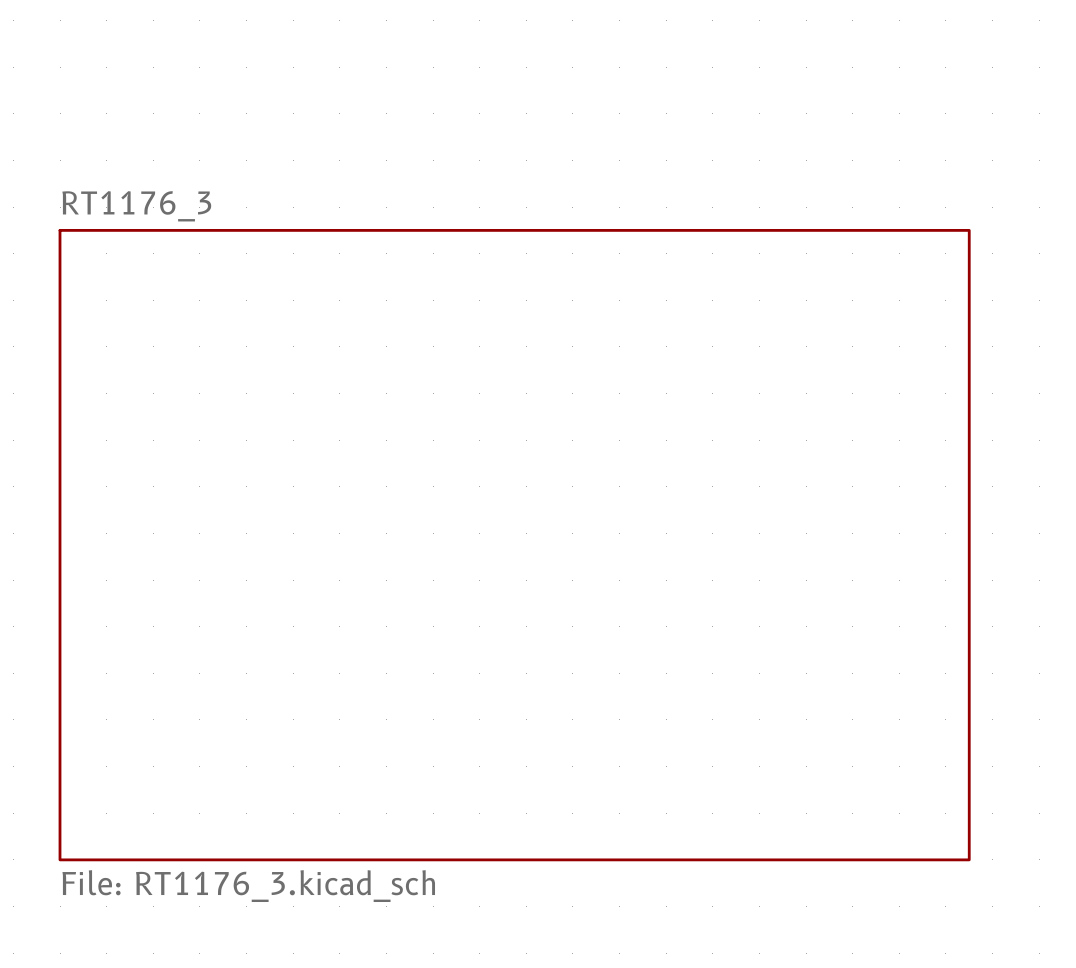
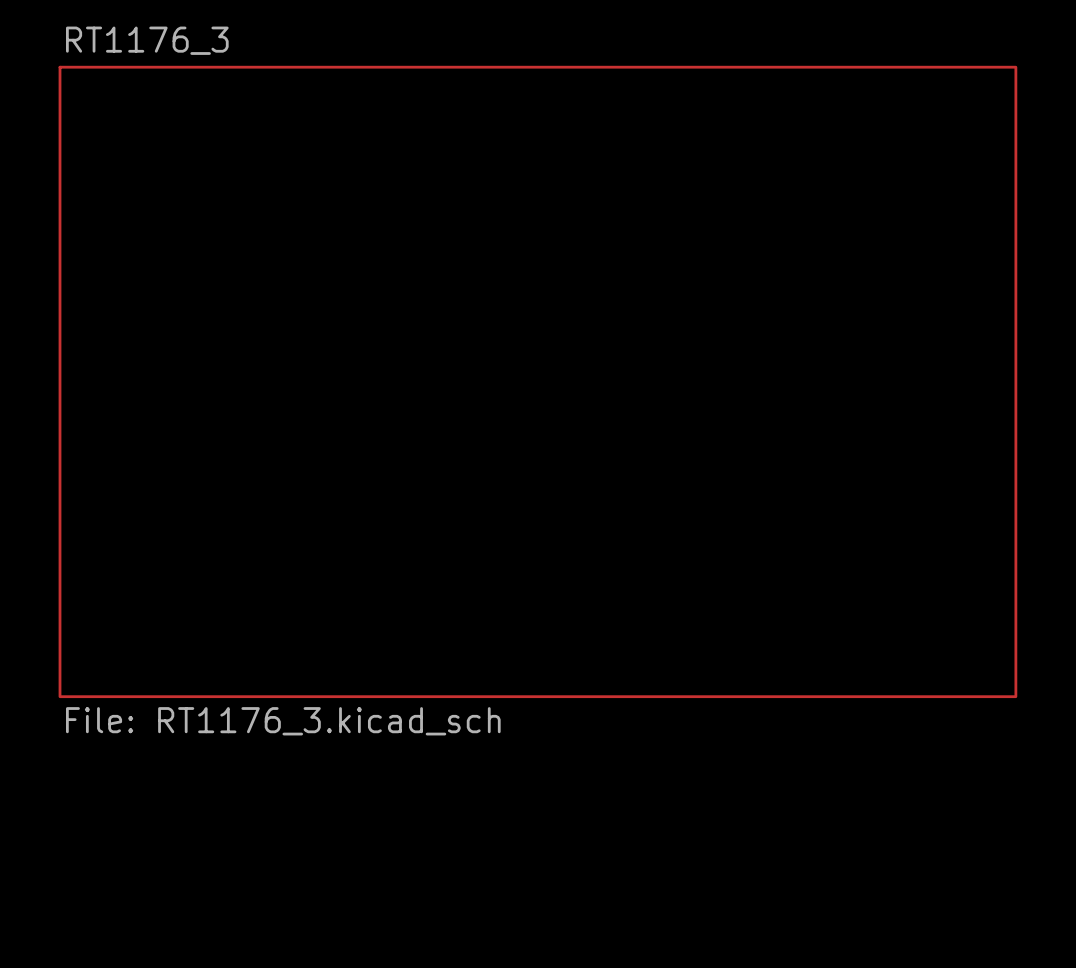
sheet RT1176_3 shape: [58, 228, 971, 862] -> [58, 65, 1018, 699]

